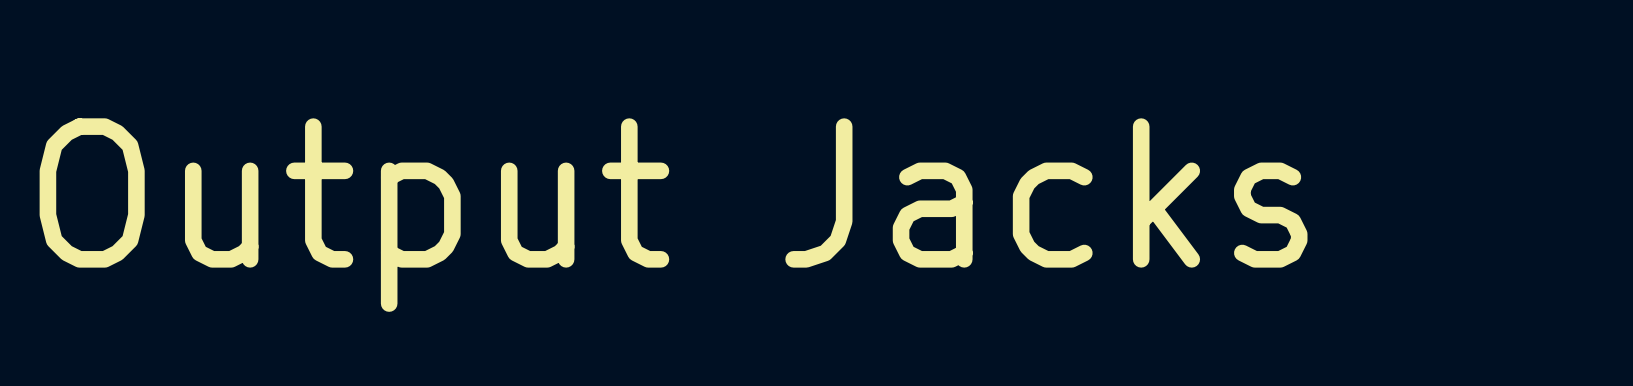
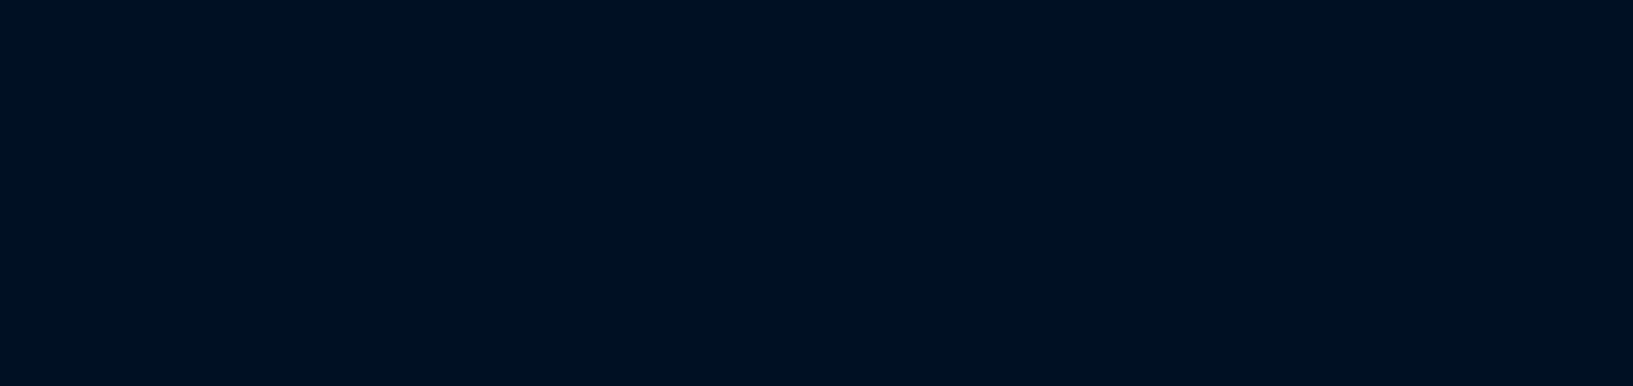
text: Output Jacks (673, 215) -> none

